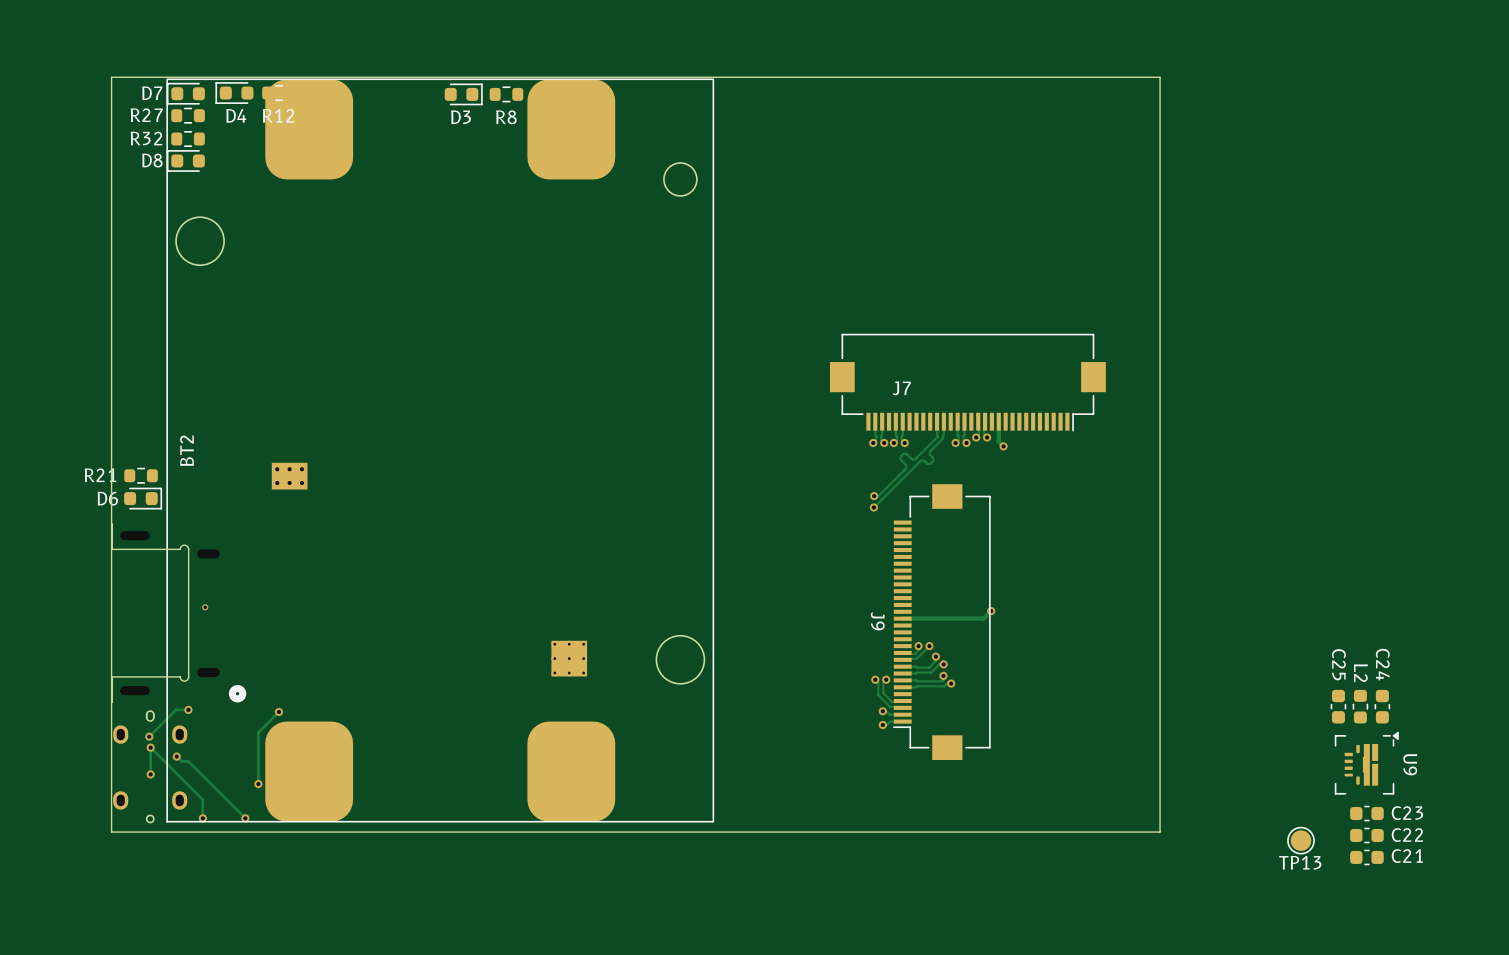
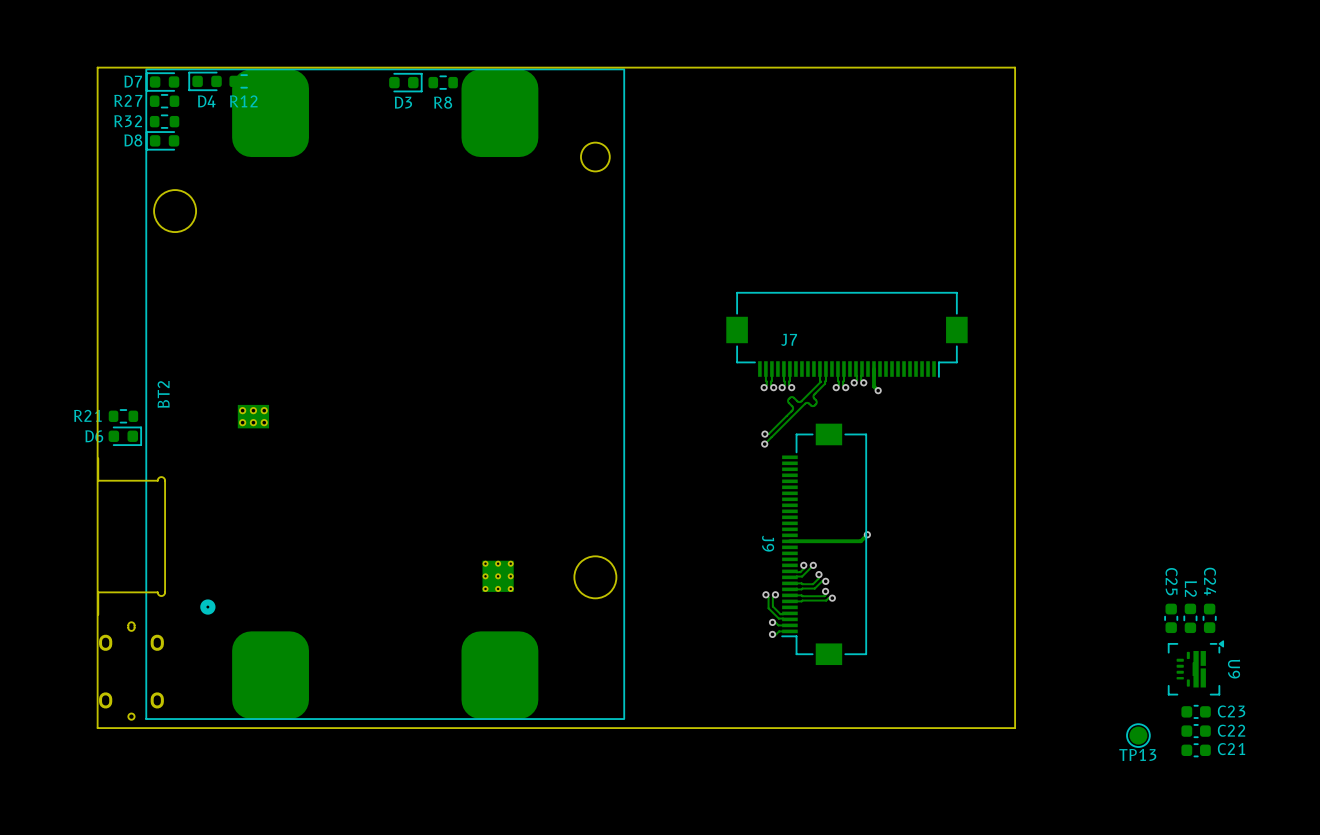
via: (205, 607) -> none
track: (188, 709) (176, 709) (149, 736) -> none
via: (188, 709) -> none
track: (278, 711) (258, 732) (258, 784) -> none
via: (278, 711) -> none
via: (149, 736) -> none
via: (150, 747) -> none
track: (176, 756) (181, 761) (188, 761) (245, 818) -> none
via: (176, 756) -> none
track: (150, 774) (150, 747) (202, 799) (202, 818) -> none
via: (150, 774) -> none
via: (258, 784) -> none
via: (202, 818) -> none
via: (245, 818) -> none

